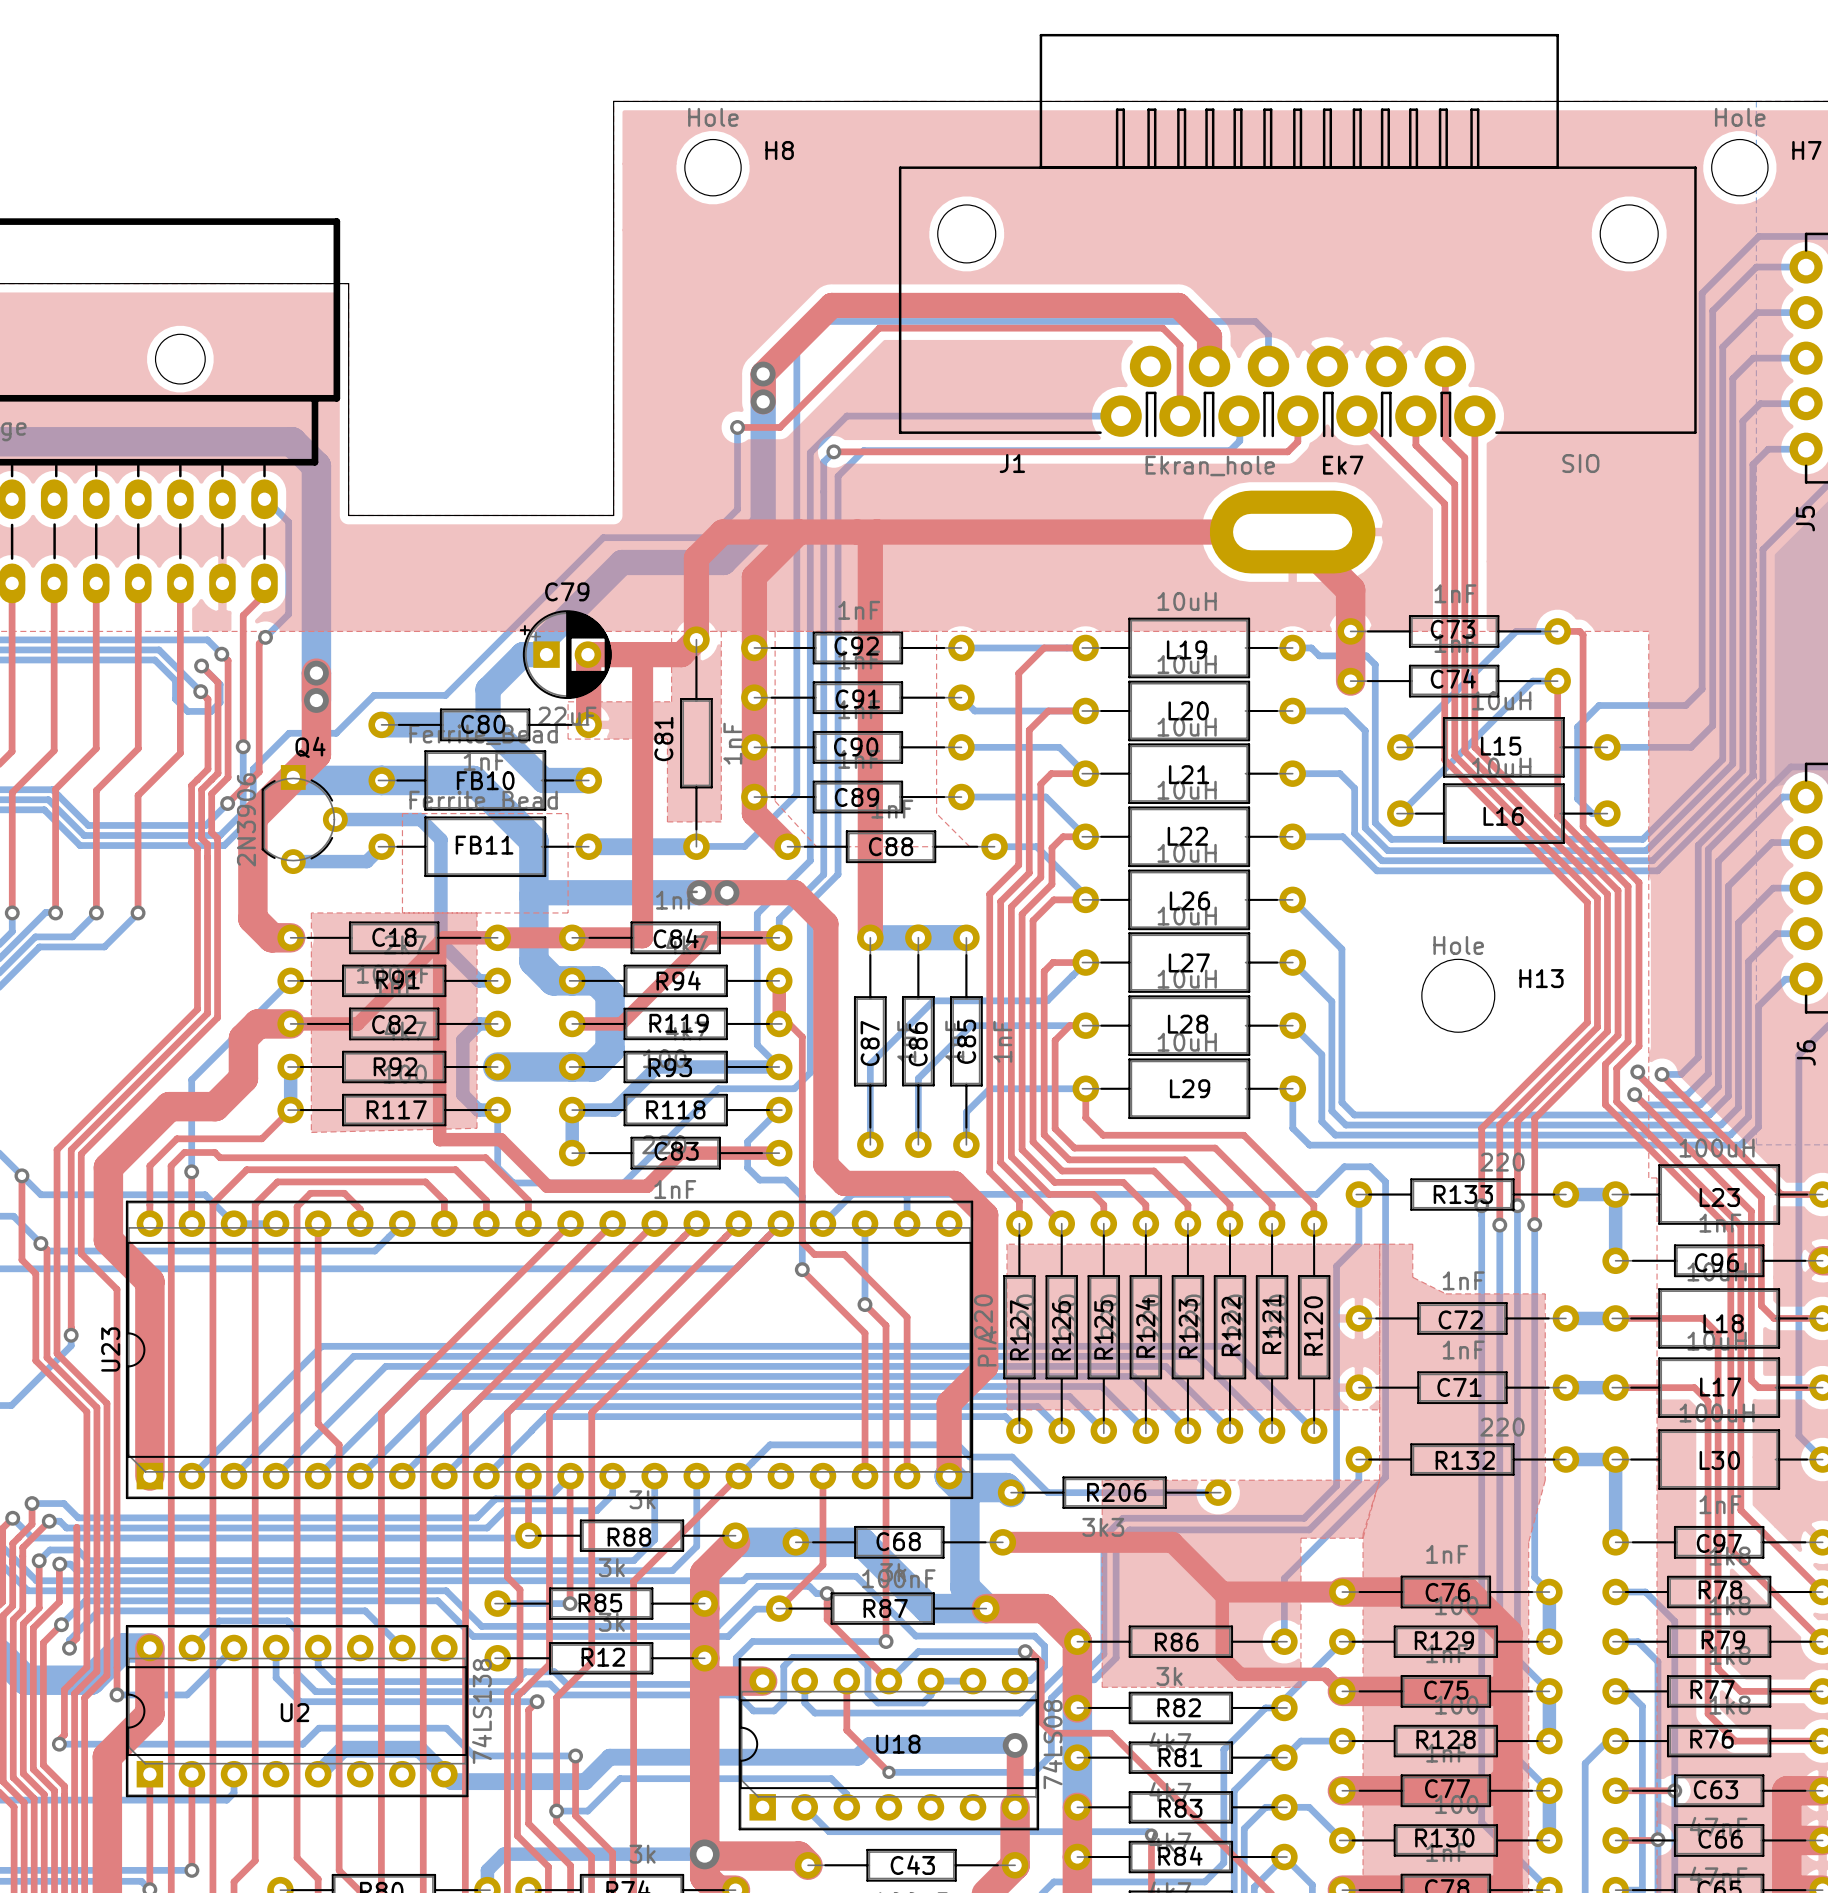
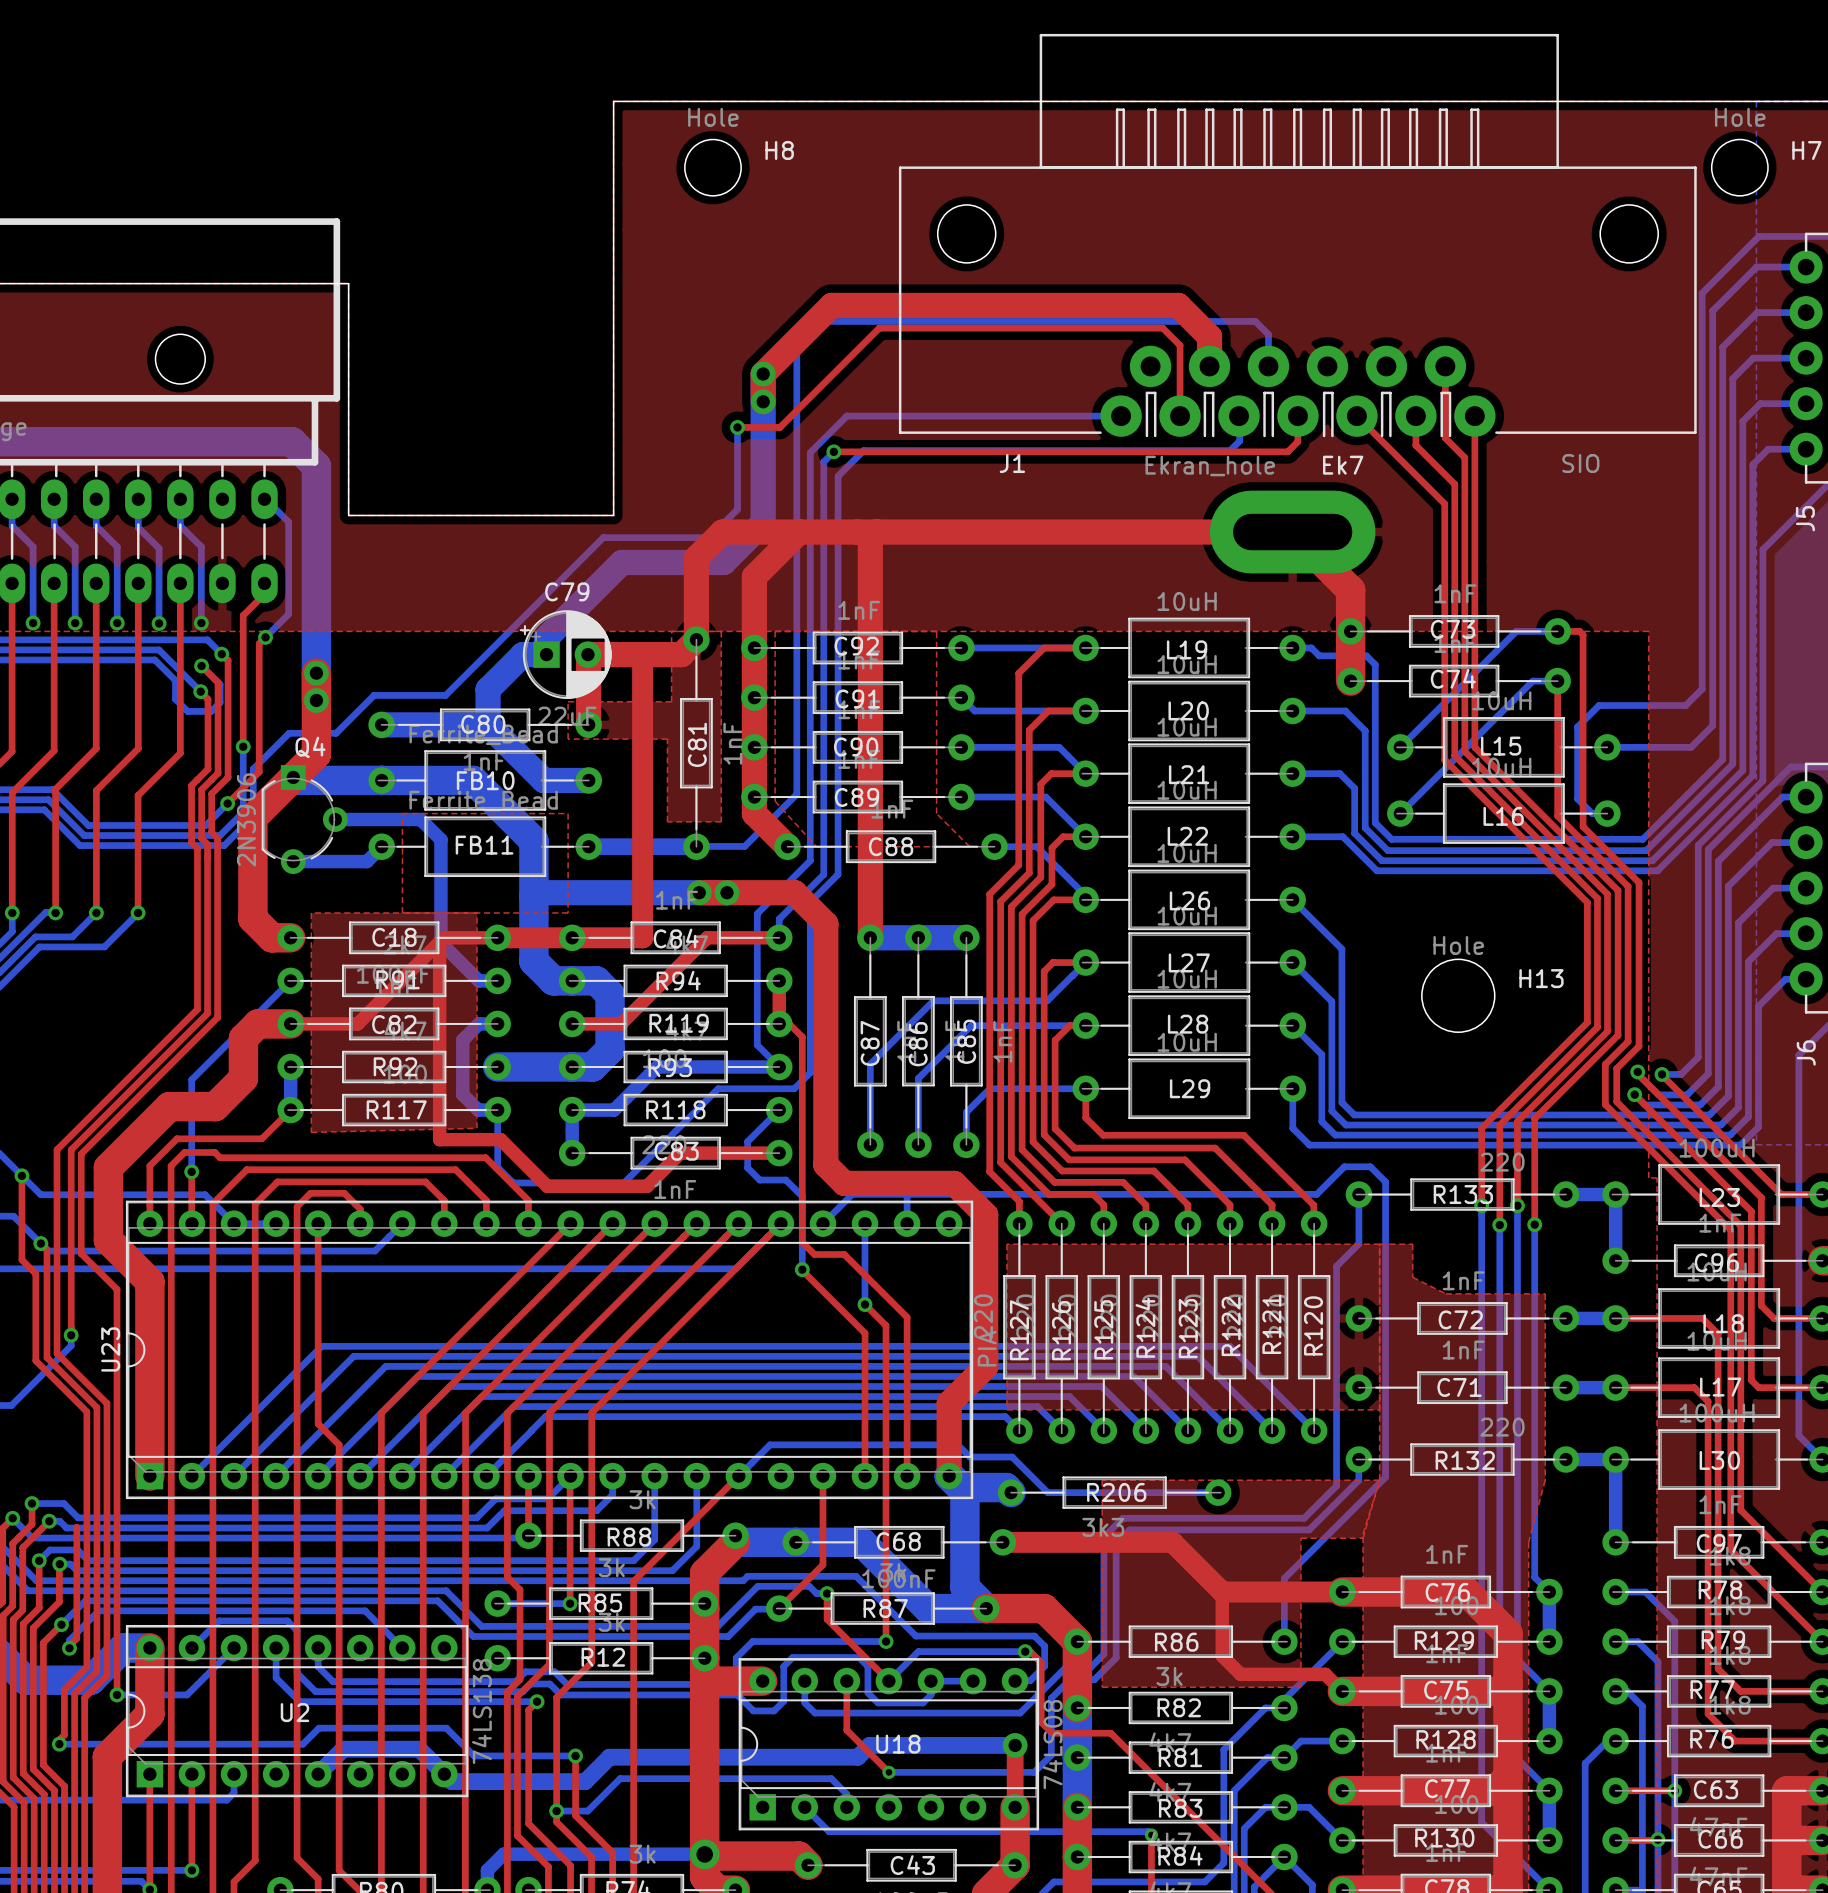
bottom track: none -> (12, 499) (12, 525) (33, 546) (33, 622)
bottom track: none -> (54, 499) (54, 525) (75, 546) (75, 623)
bottom track: none -> (96, 499) (96, 525) (117, 546) (117, 623)
bottom track: none -> (138, 499) (138, 527) (159, 548) (159, 623)
bottom track: none -> (180, 499) (180, 525) (201, 546) (201, 623)
via: none -> (33, 623)
via: none -> (75, 623)
via: none -> (117, 623)
via: none -> (159, 623)
via: none -> (201, 623)
C81 name position: C81 (663, 739) -> C81 (697, 744)

